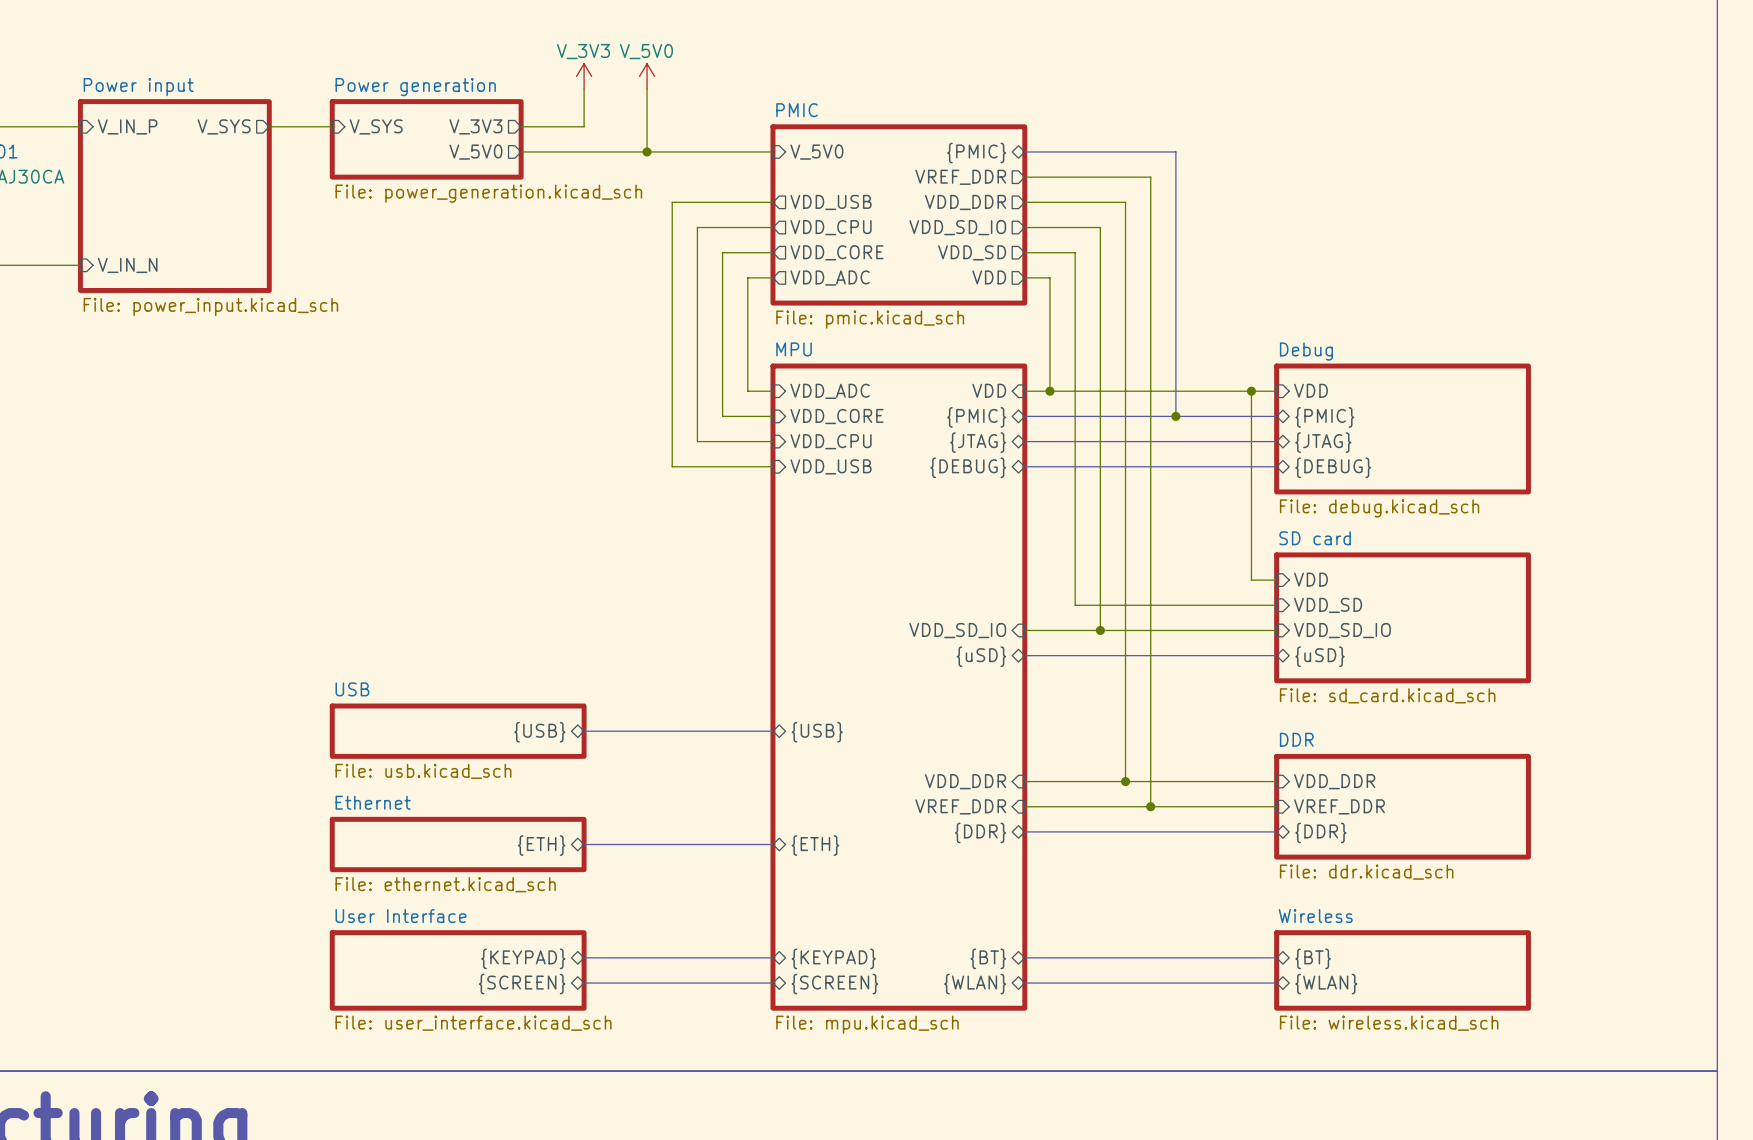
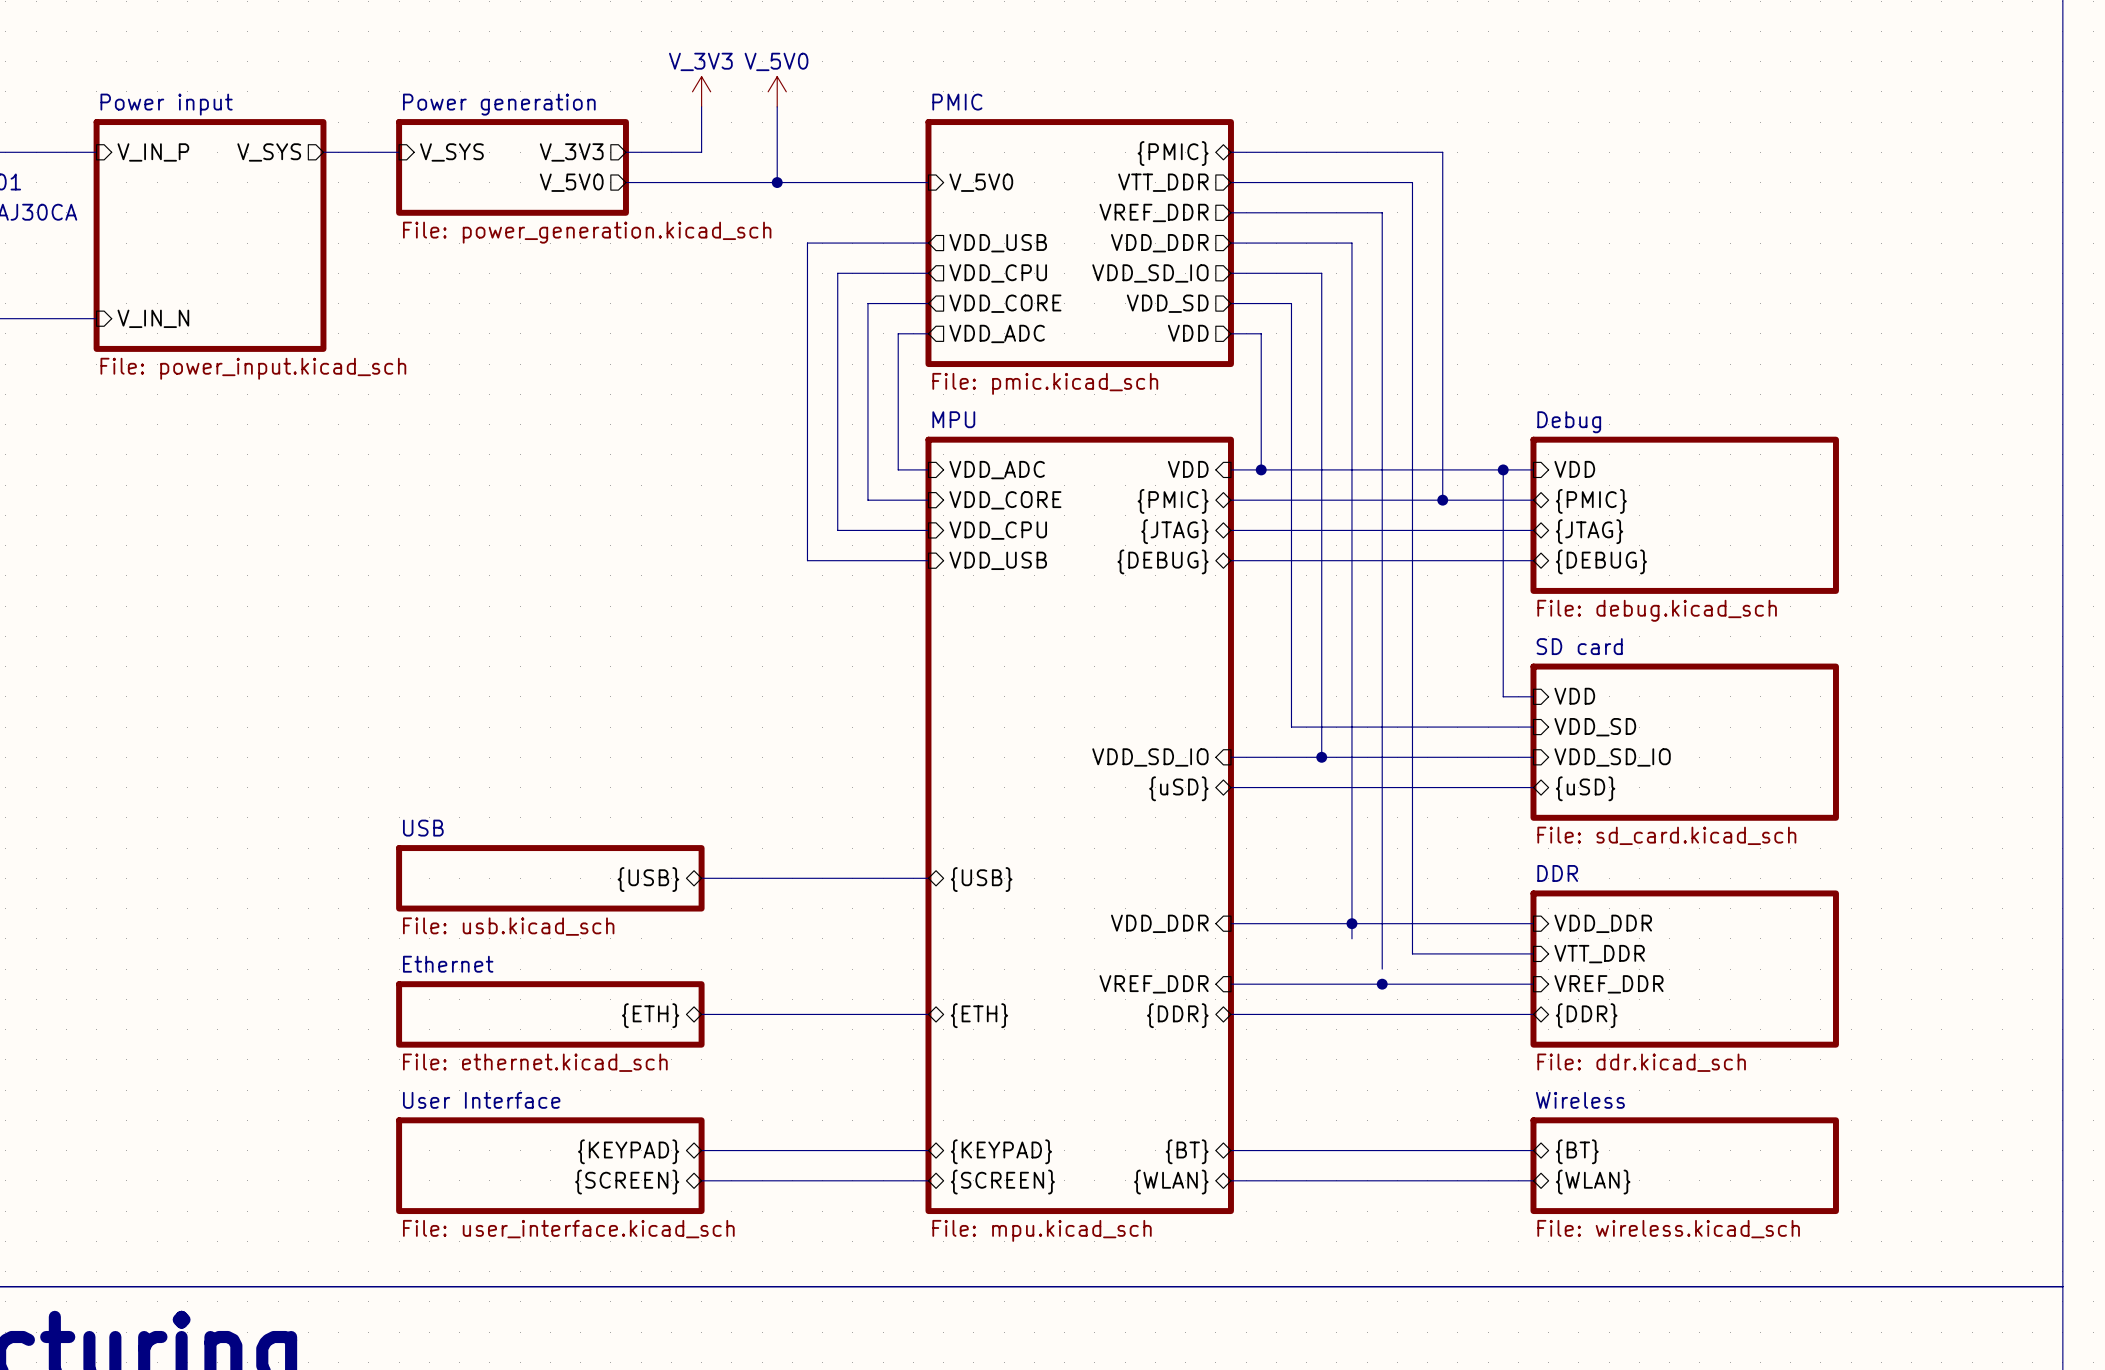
bus: none -> (1230, 152) (1442, 152) (1442, 500)
sheet pin: none -> {PMIC} (1173, 153)
bus: (1024, 151) (1175, 151) (1175, 416) -> none
wire: none -> (1230, 182) (1412, 182) (1412, 953) (1533, 953)
sheet pin shape: bidirectional (976, 153) -> output (1163, 182)
sheet pin: {PMIC} (976, 153) -> VTT_DDR (1163, 182)
sheet PMIC: none -> File: pmic.kicad_sch (1079, 243)
sheet PMIC: File: pmic.kicad_sch (898, 214) -> none
junction position: (1175, 416) -> (1442, 500)
sheet DDR shape: [1274, 753, 1531, 860] -> [1530, 890, 1839, 1048]
sheet pin position: VDD_DDR (965, 781) -> VDD_DDR (1159, 923)
wire: (1024, 781) (1276, 781) -> (1230, 923) (1533, 923)
junction position: (1125, 781) -> (1351, 923)
sheet pin position: VDD_DDR (1334, 781) -> VDD_DDR (1603, 923)
sheet pin: none -> VTT_DDR (1599, 954)
sheet pin position: VREF_DDR (960, 806) -> VREF_DDR (1154, 984)
wire: (1024, 806) (1276, 806) -> (1230, 984) (1533, 984)
junction position: (1150, 806) -> (1382, 984)
sheet pin position: VREF_DDR (1339, 806) -> VREF_DDR (1608, 984)
bus: (1024, 831) (1276, 831) -> (1230, 1014) (1533, 1014)
sheet pin position: {DDR} (980, 832) -> {DDR} (1177, 1015)
sheet pin position: {DDR} (1320, 832) -> {DDR} (1586, 1015)

